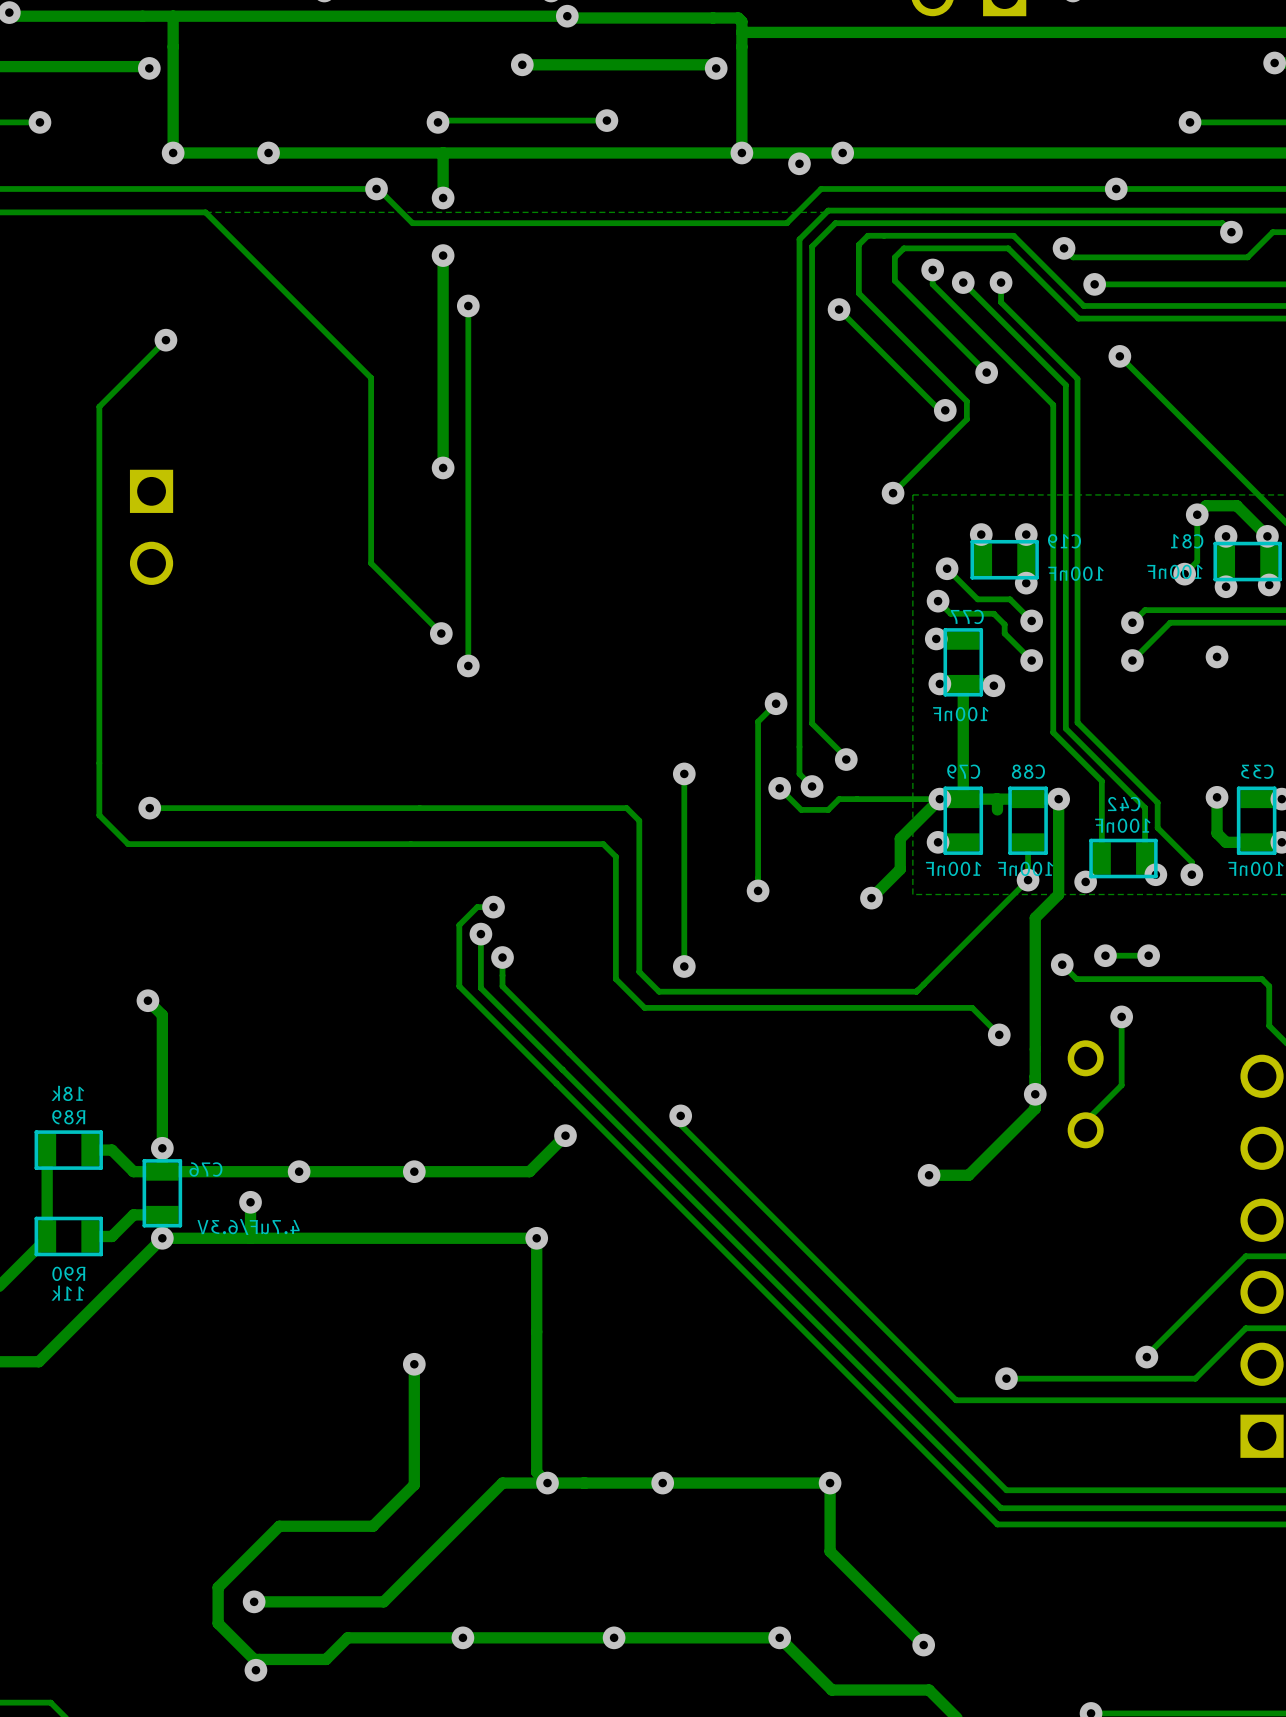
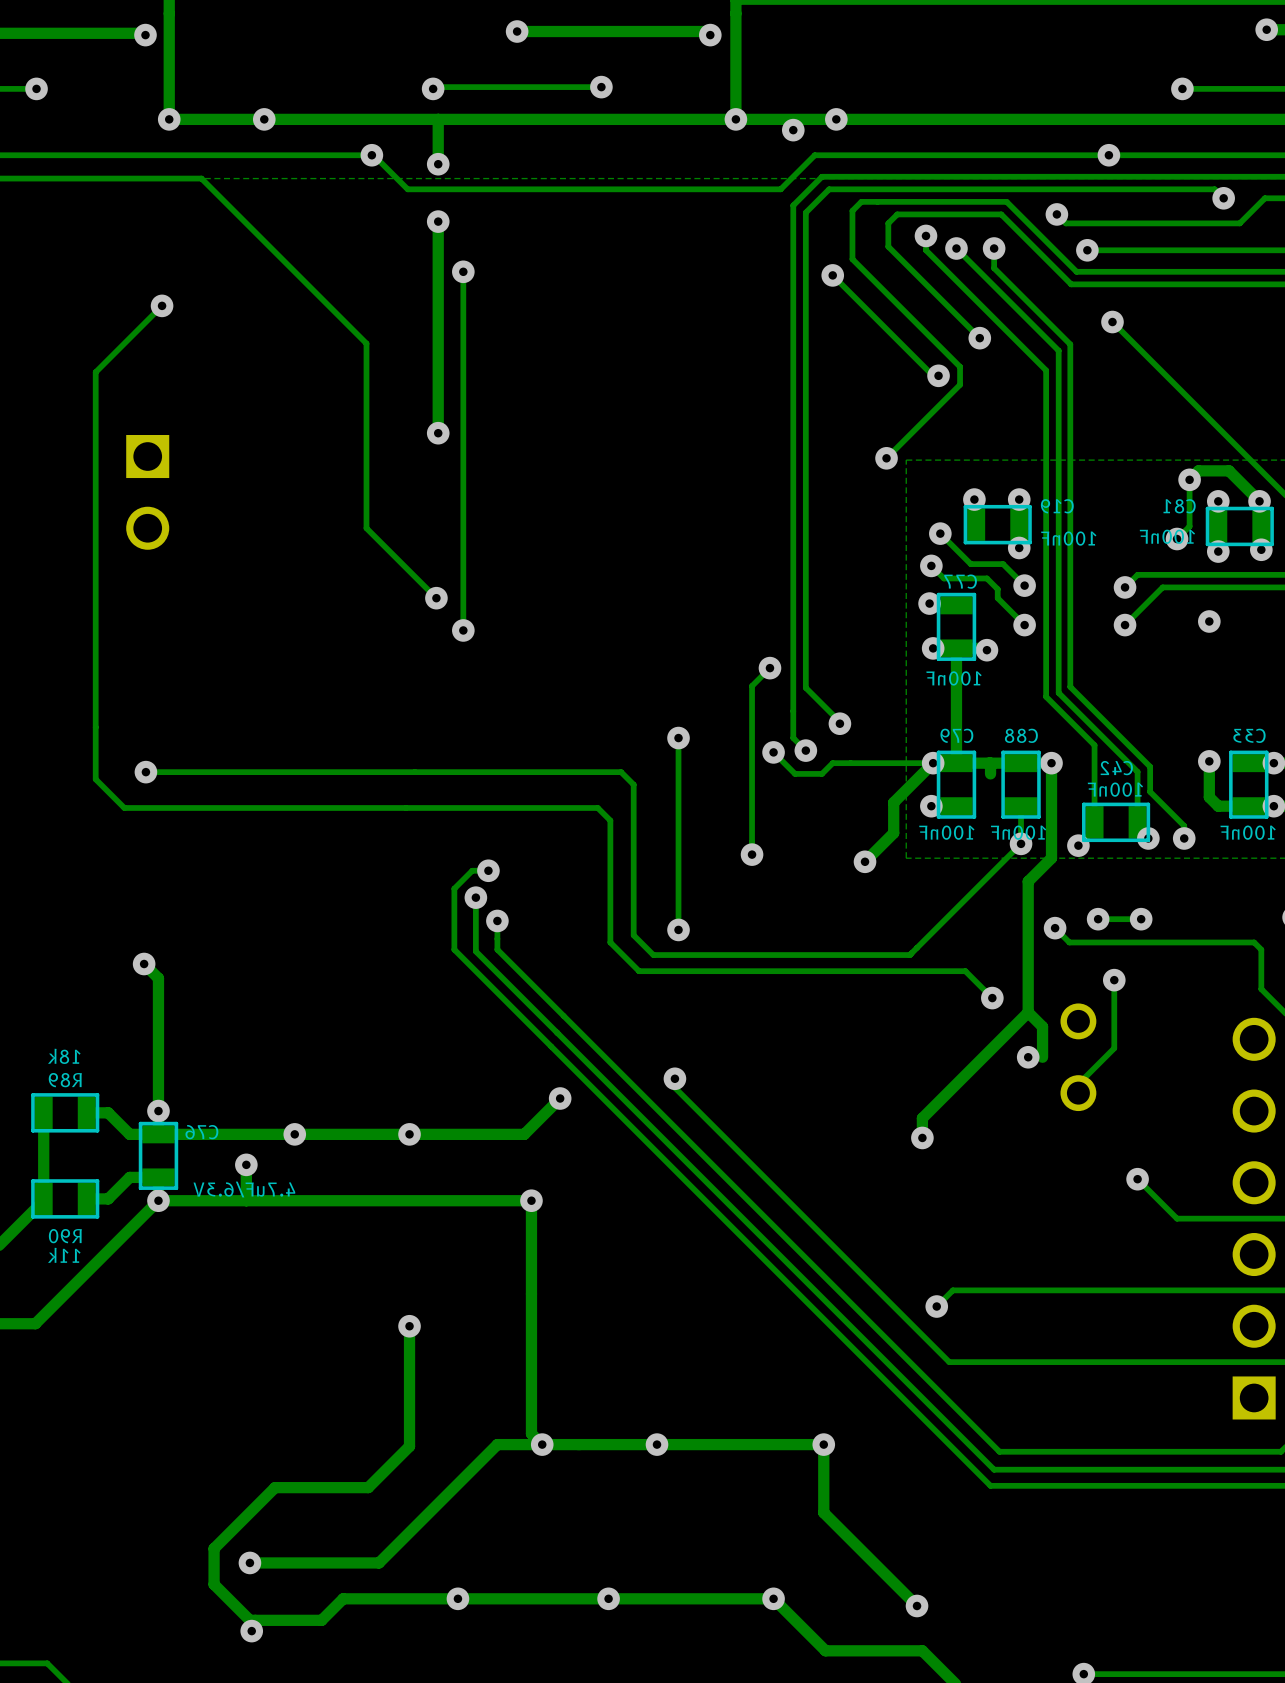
track: (1035, 1049) (1035, 1108) (968, 1175) (929, 1175) -> (1042, 1057) (1042, 1026) (1028, 1012) (922, 1118) (922, 1137)
via: none -> (1137, 1179)
track: (1245, 1256) (1146, 1357) -> (1238, 1218) (1177, 1218) (1137, 1179)
track: (1245, 1328) (1195, 1378) (1006, 1378) -> (1238, 1290) (952, 1290) (936, 1306)
via: (1146, 1357) -> none
via position: (1006, 1378) -> (936, 1306)

